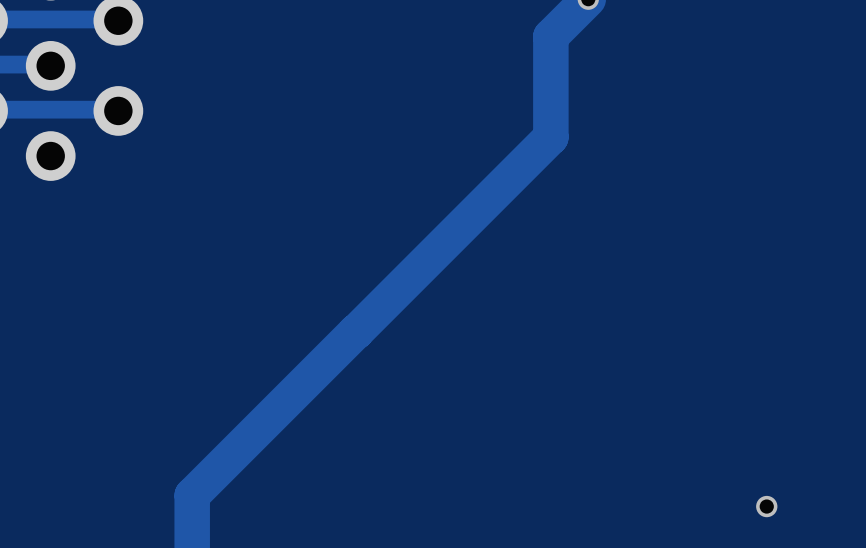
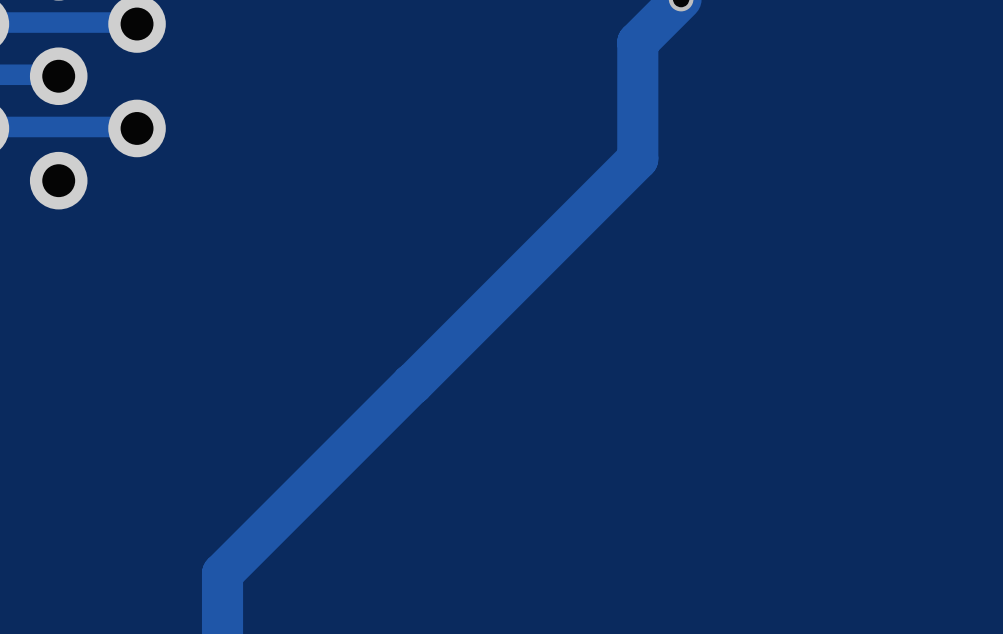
via: (766, 506) -> none

